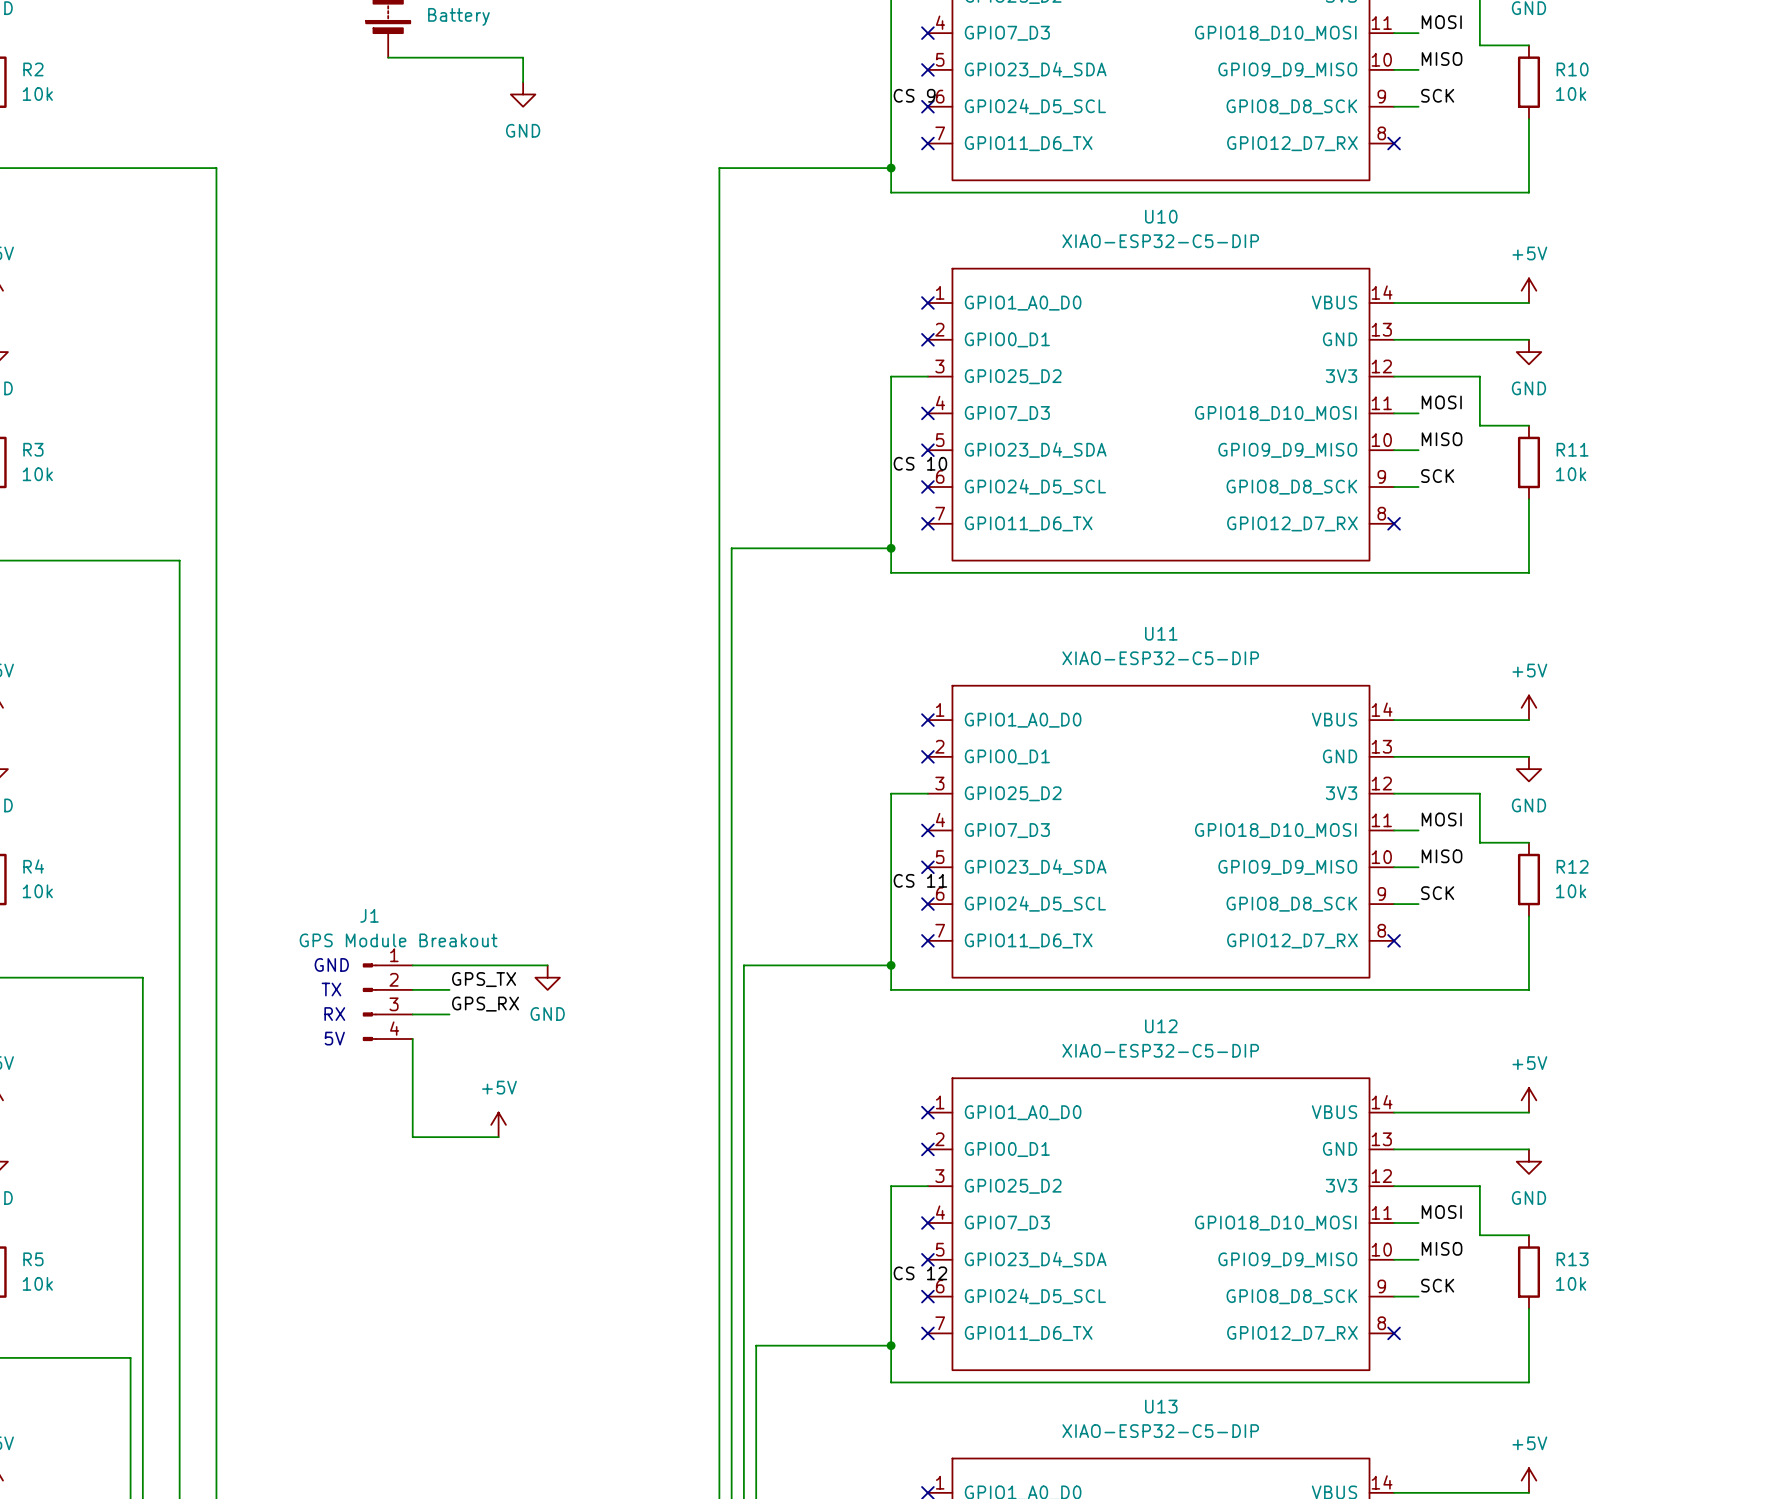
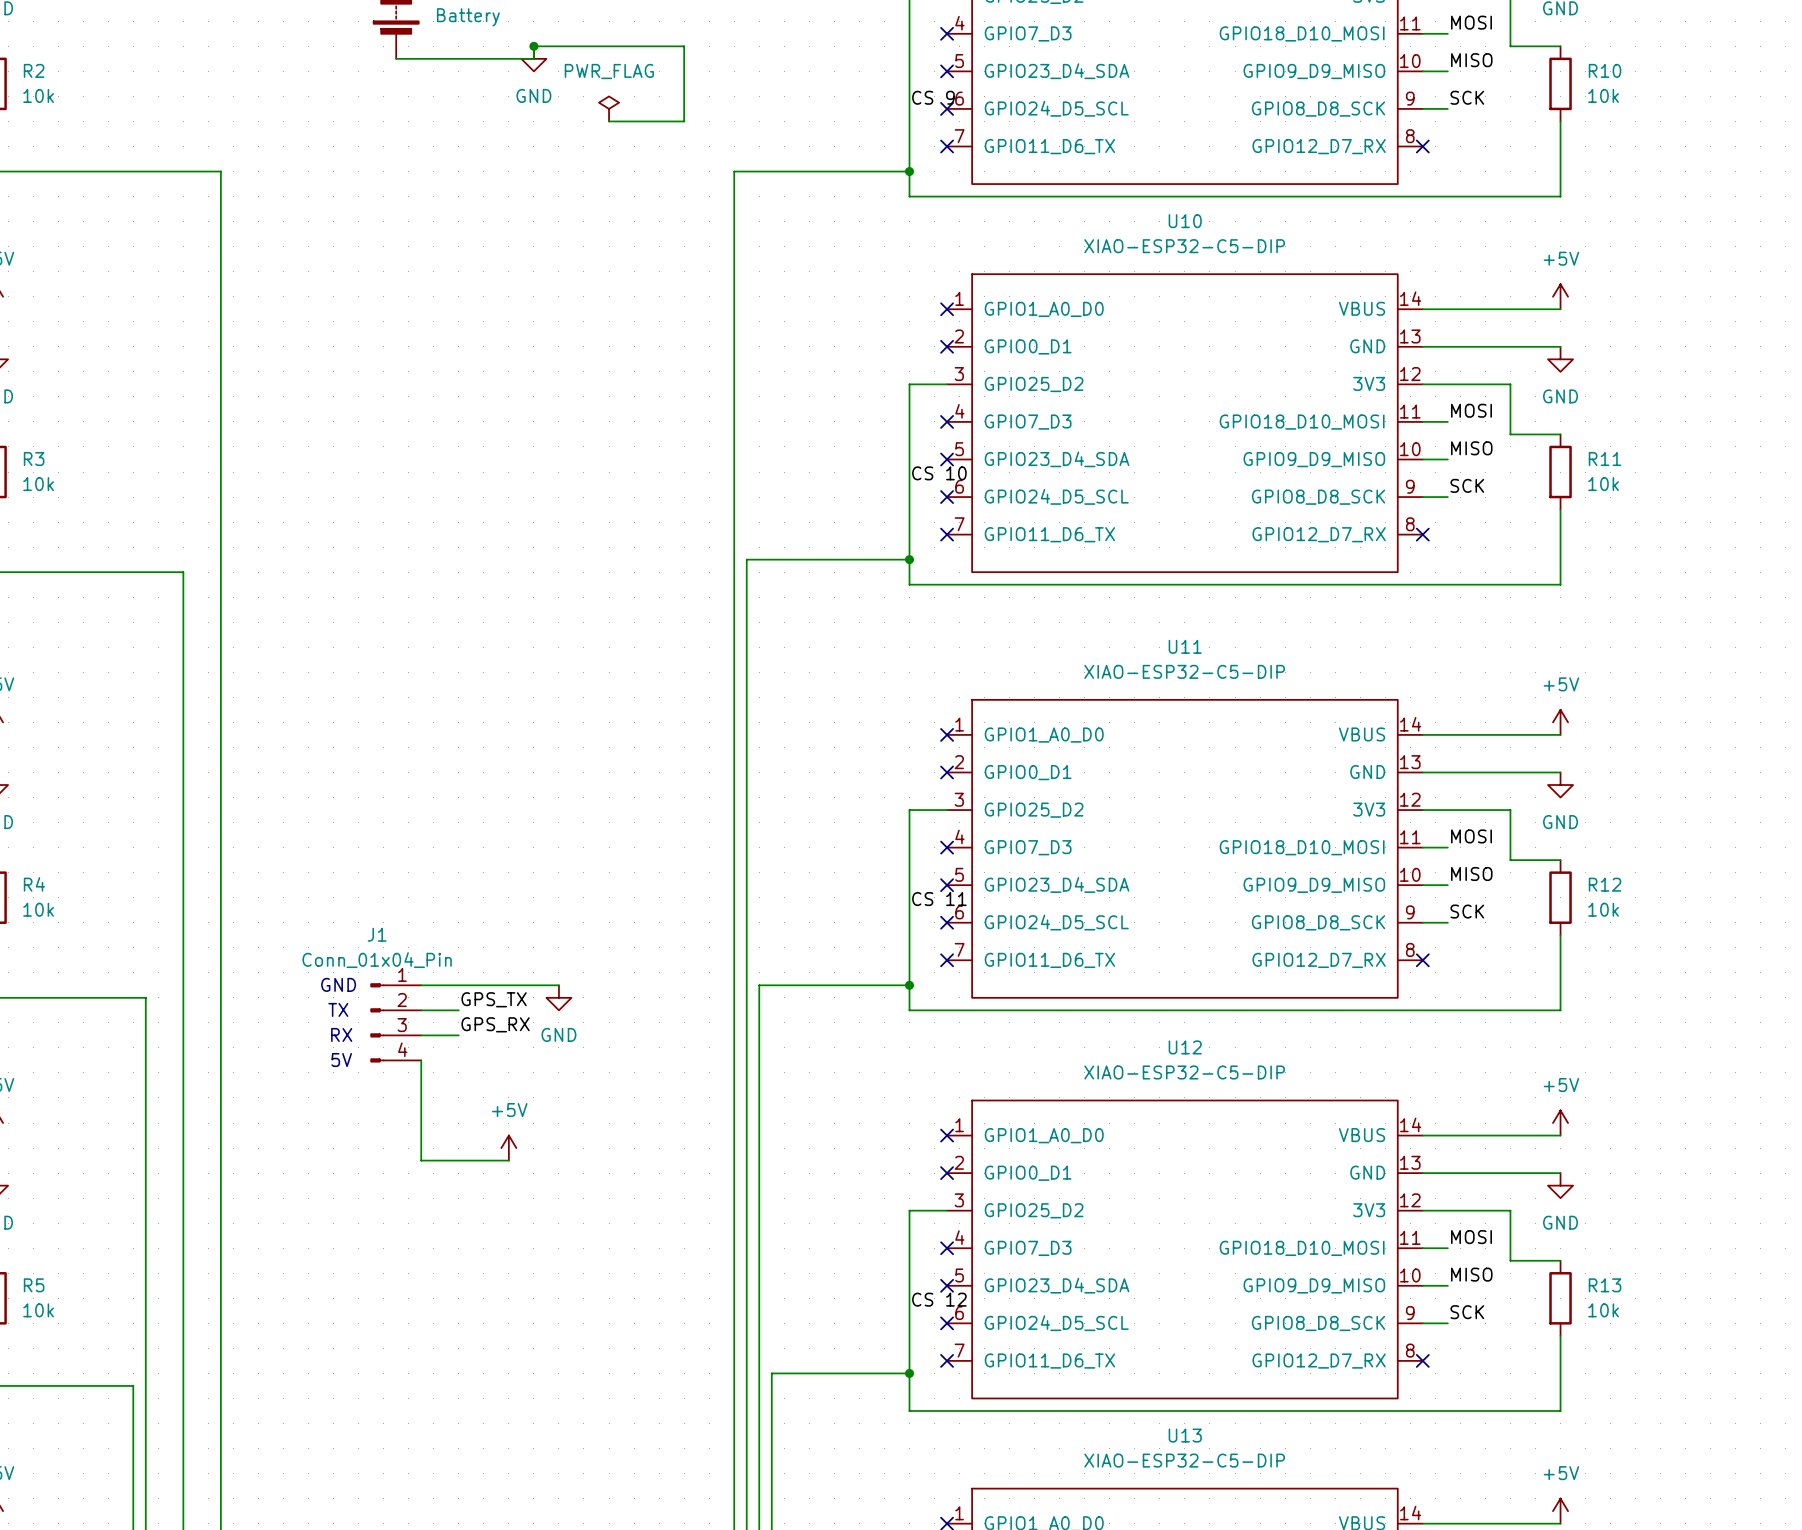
junction: none -> (533, 46)
wire: (523, 57) (523, 82) -> (533, 58) (533, 46) (684, 46) (684, 121) (609, 121)
power symbol position: GND (523, 94) -> GND (533, 58)
power symbol: none -> PWR_FLAG (609, 108)
J1 value: GPS Module Breakout (398, 940) -> Conn_01x04_Pin (377, 960)

